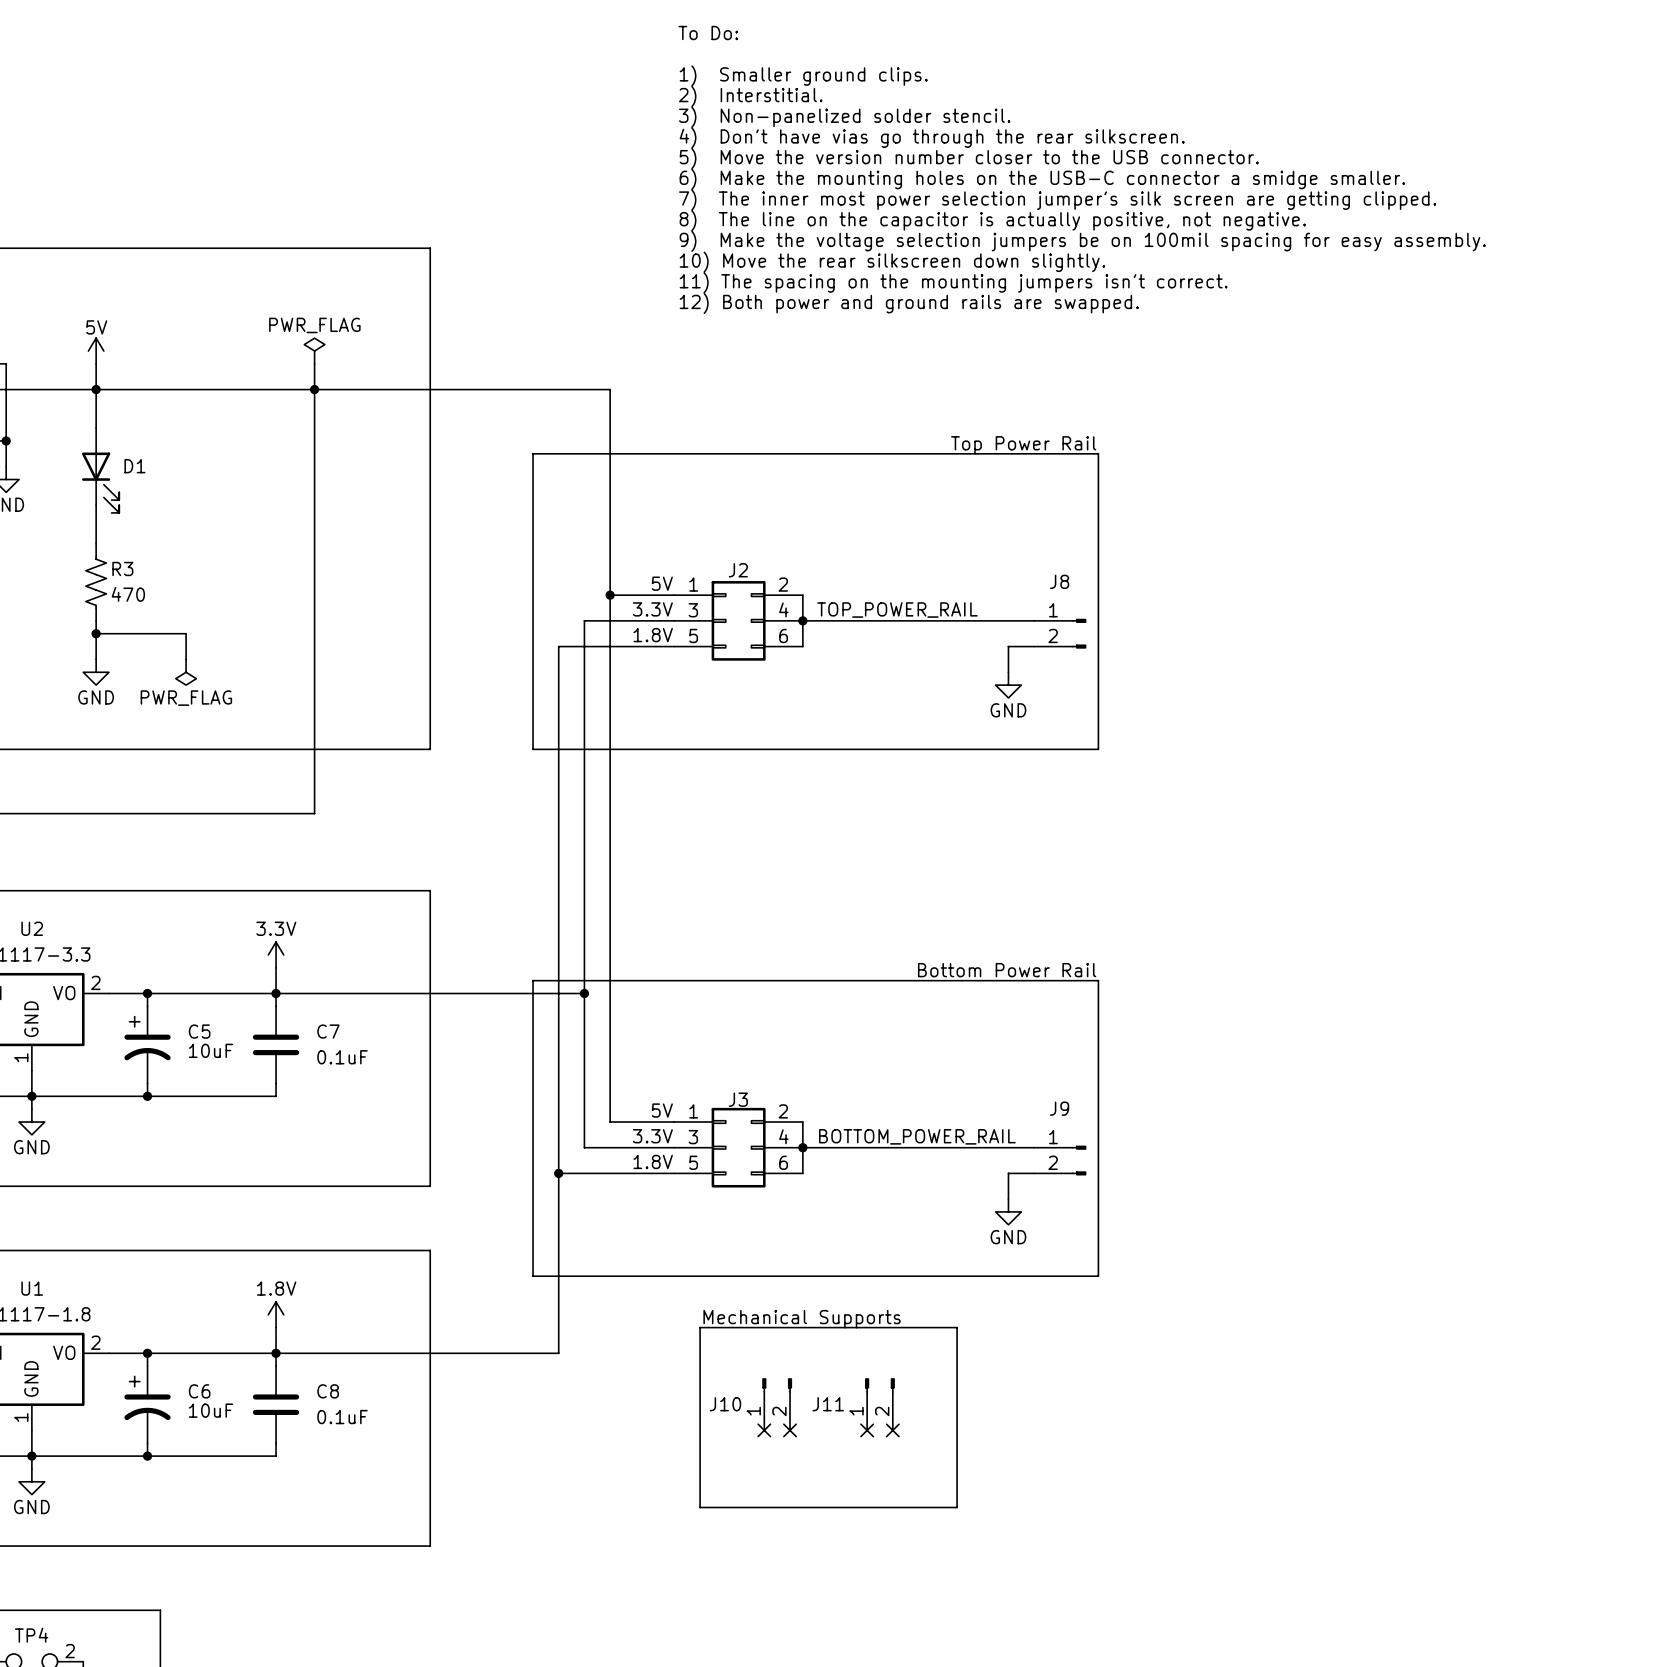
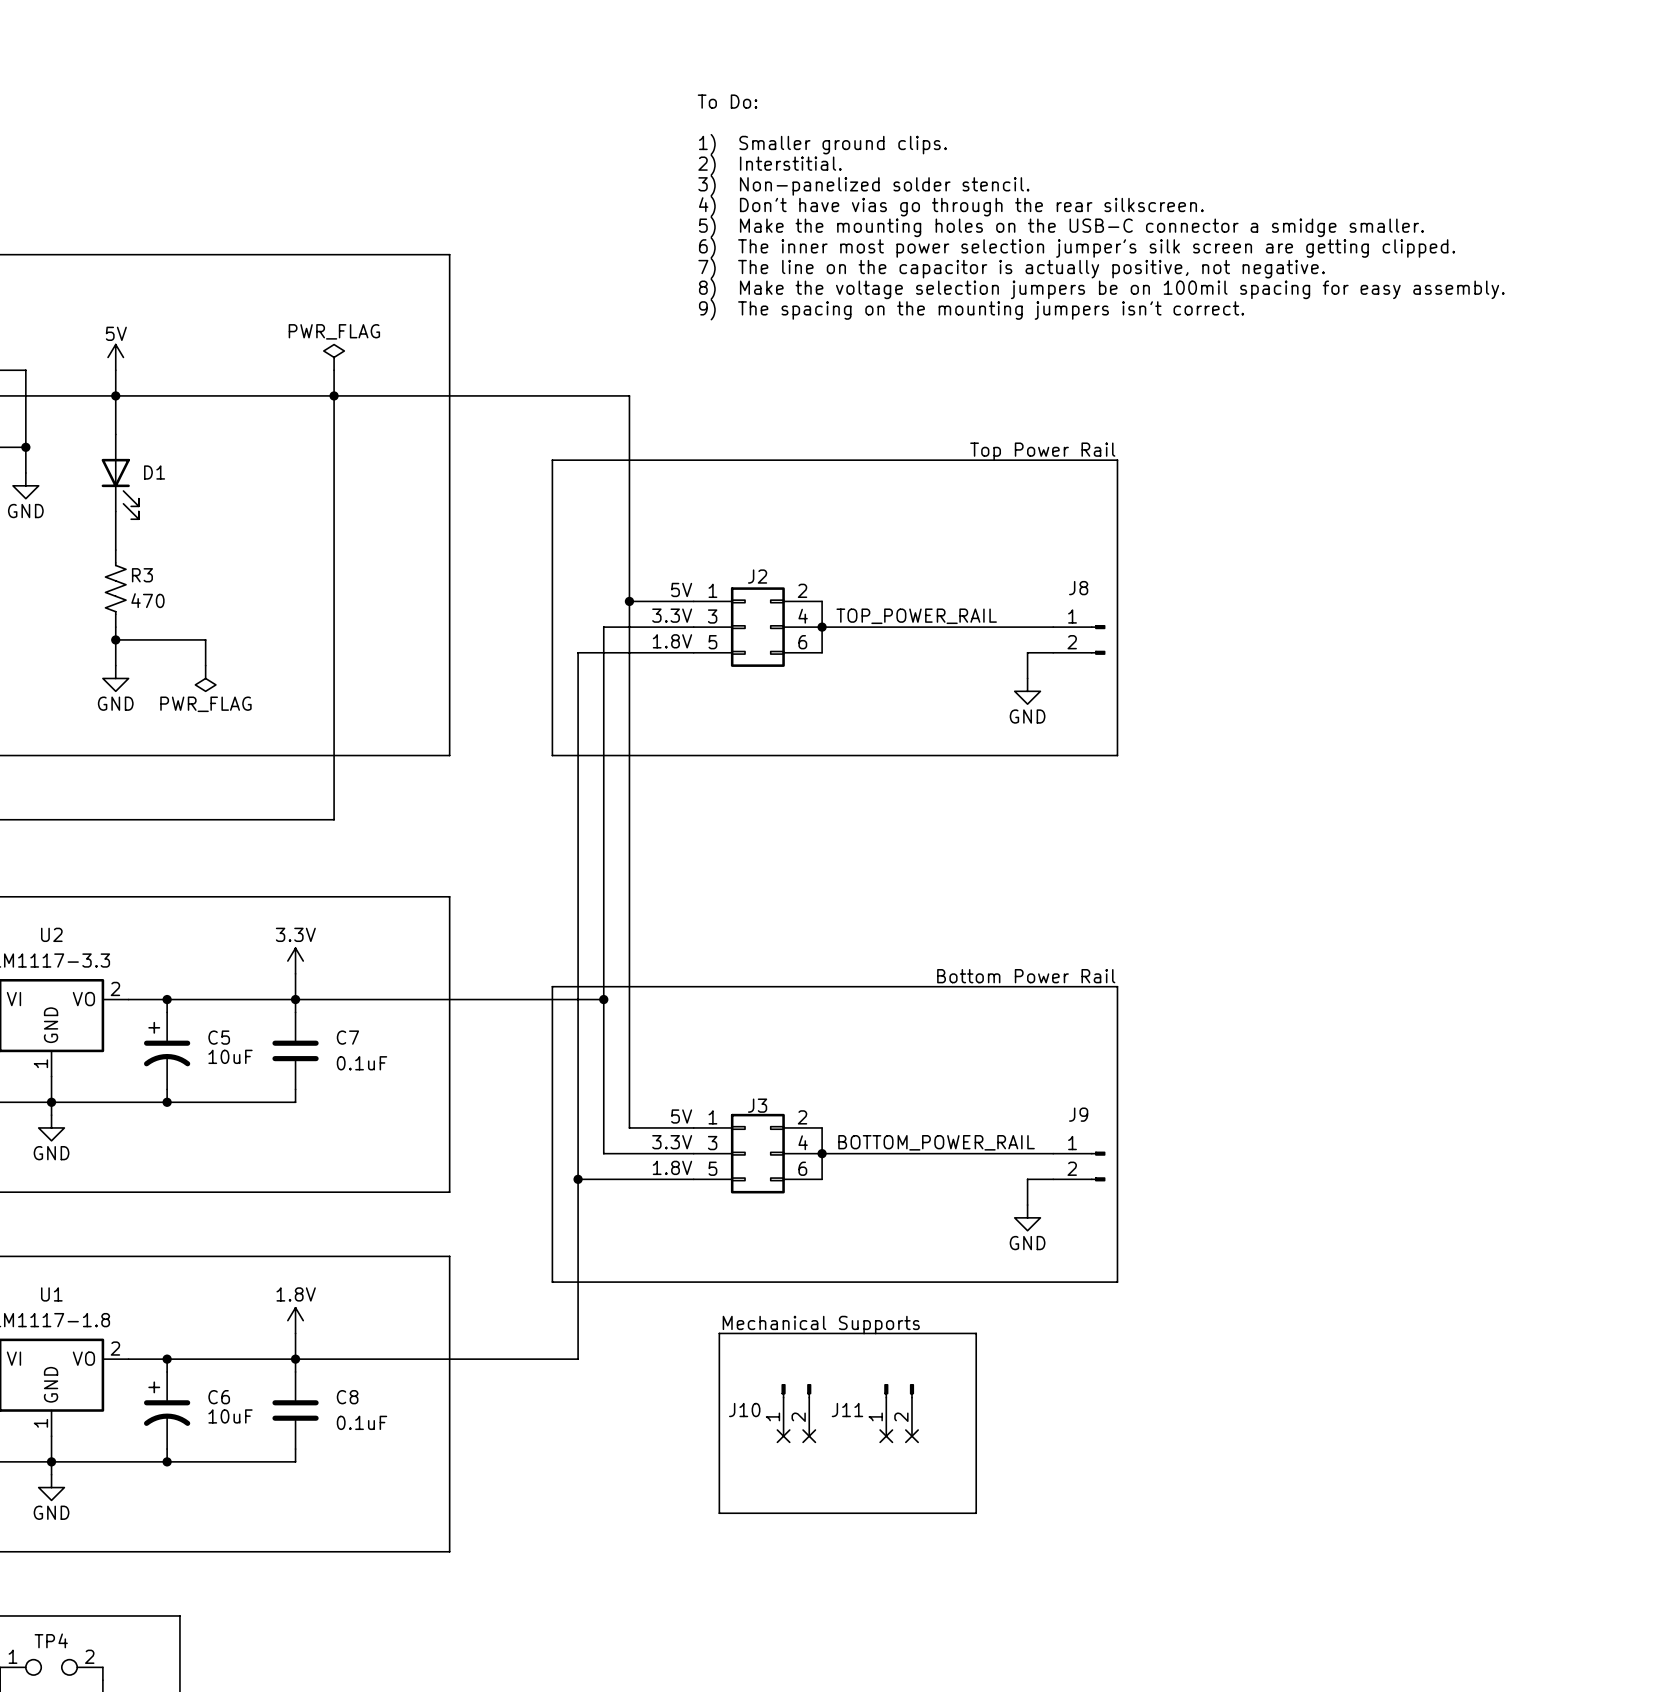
text: To Do: (708, 33) -> none
text: 1) Smaller ground clips. (803, 75) -> none
text: 2) Interstitial. (750, 96) -> To Do: (727, 101)
text: 3) Non-panelized solder stencil. (844, 117) -> none
text: 4) Don't have vias go through the rear silkscreen. (932, 137) -> 1) Smaller ground clips. (822, 144)
text: 5) Move the version number closer to the USB connector. (969, 158) -> 2) Interstitial. (770, 165)
text: 6) Make the mounting holes on the USB-C connector a smidge smaller. (1042, 179) -> 3) Non-panelized solder stencil. (863, 185)
text: 7) The inner most power selection jumper's silk screen are getting clipped. (1057, 200) -> 4) Don't have vias go through the rear silkscreen. (951, 206)
text: 8) The line on the capacitor is actually positive, not negative. (992, 220) -> 5) Make the mounting holes on the USB-C connector a smidge smaller. (1061, 227)
text: 9) Make the voltage selection jumpers be on 100mil spacing for easy assembly. (1082, 241) -> 6) The inner most power selection jumper's silk screen are getting clipped. (1077, 247)
text: 10) Move the rear silkscreen down slightly. (892, 262) -> 7) The line on the capacitor is actually positive, not negative. (1011, 268)
text: 11) The spacing on the mounting jumpers isn't correct. (953, 282) -> 8) Make the voltage selection jumpers be on 100mil spacing for easy assembly. (1101, 289)
text: 12) Both power and ground rails are swapped. (909, 303) -> 9) The spacing on the mounting jumpers isn't correct. (971, 309)

